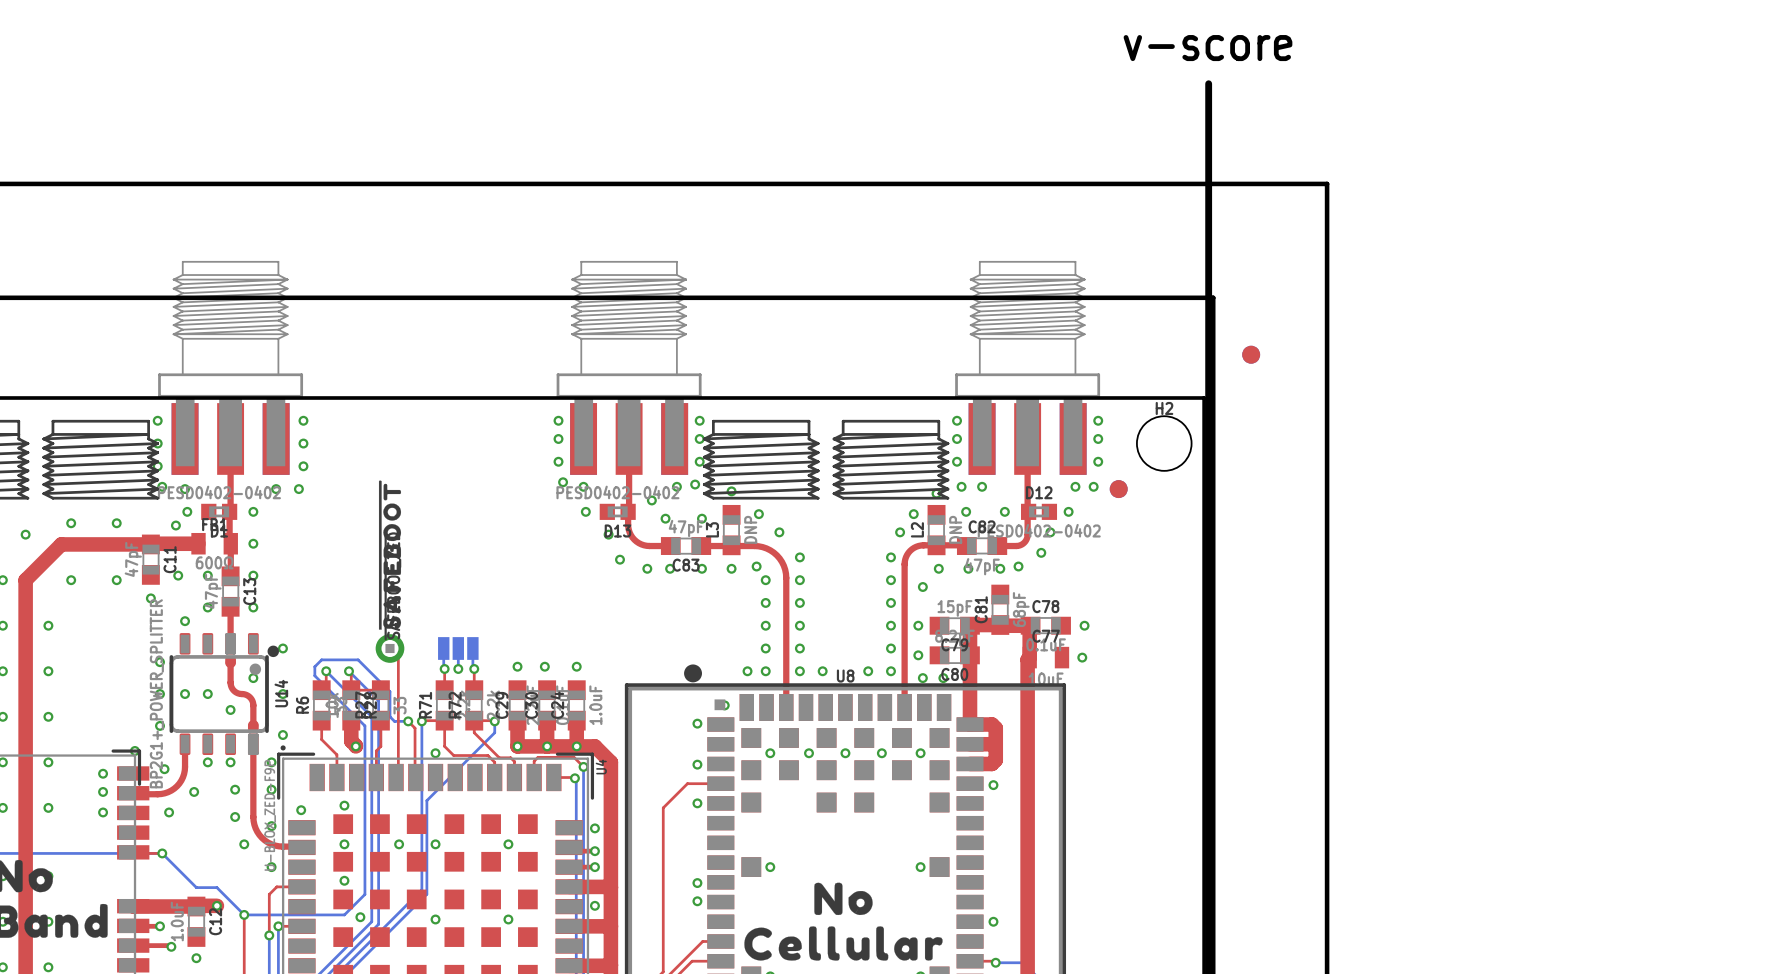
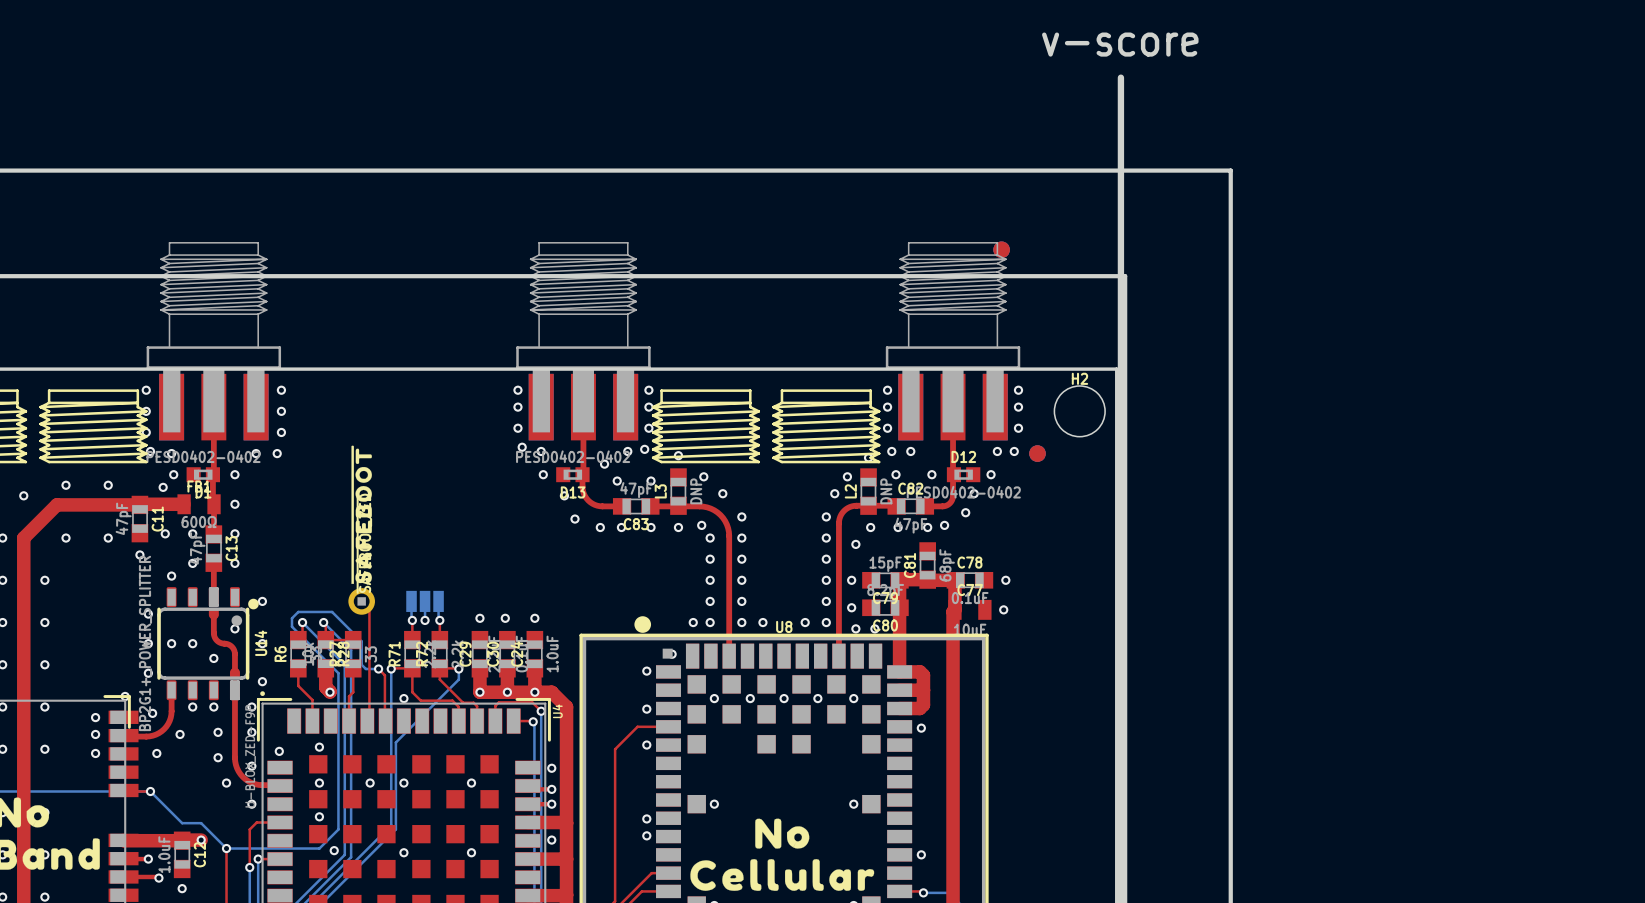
part position: (1251, 354) -> (1001, 249)

